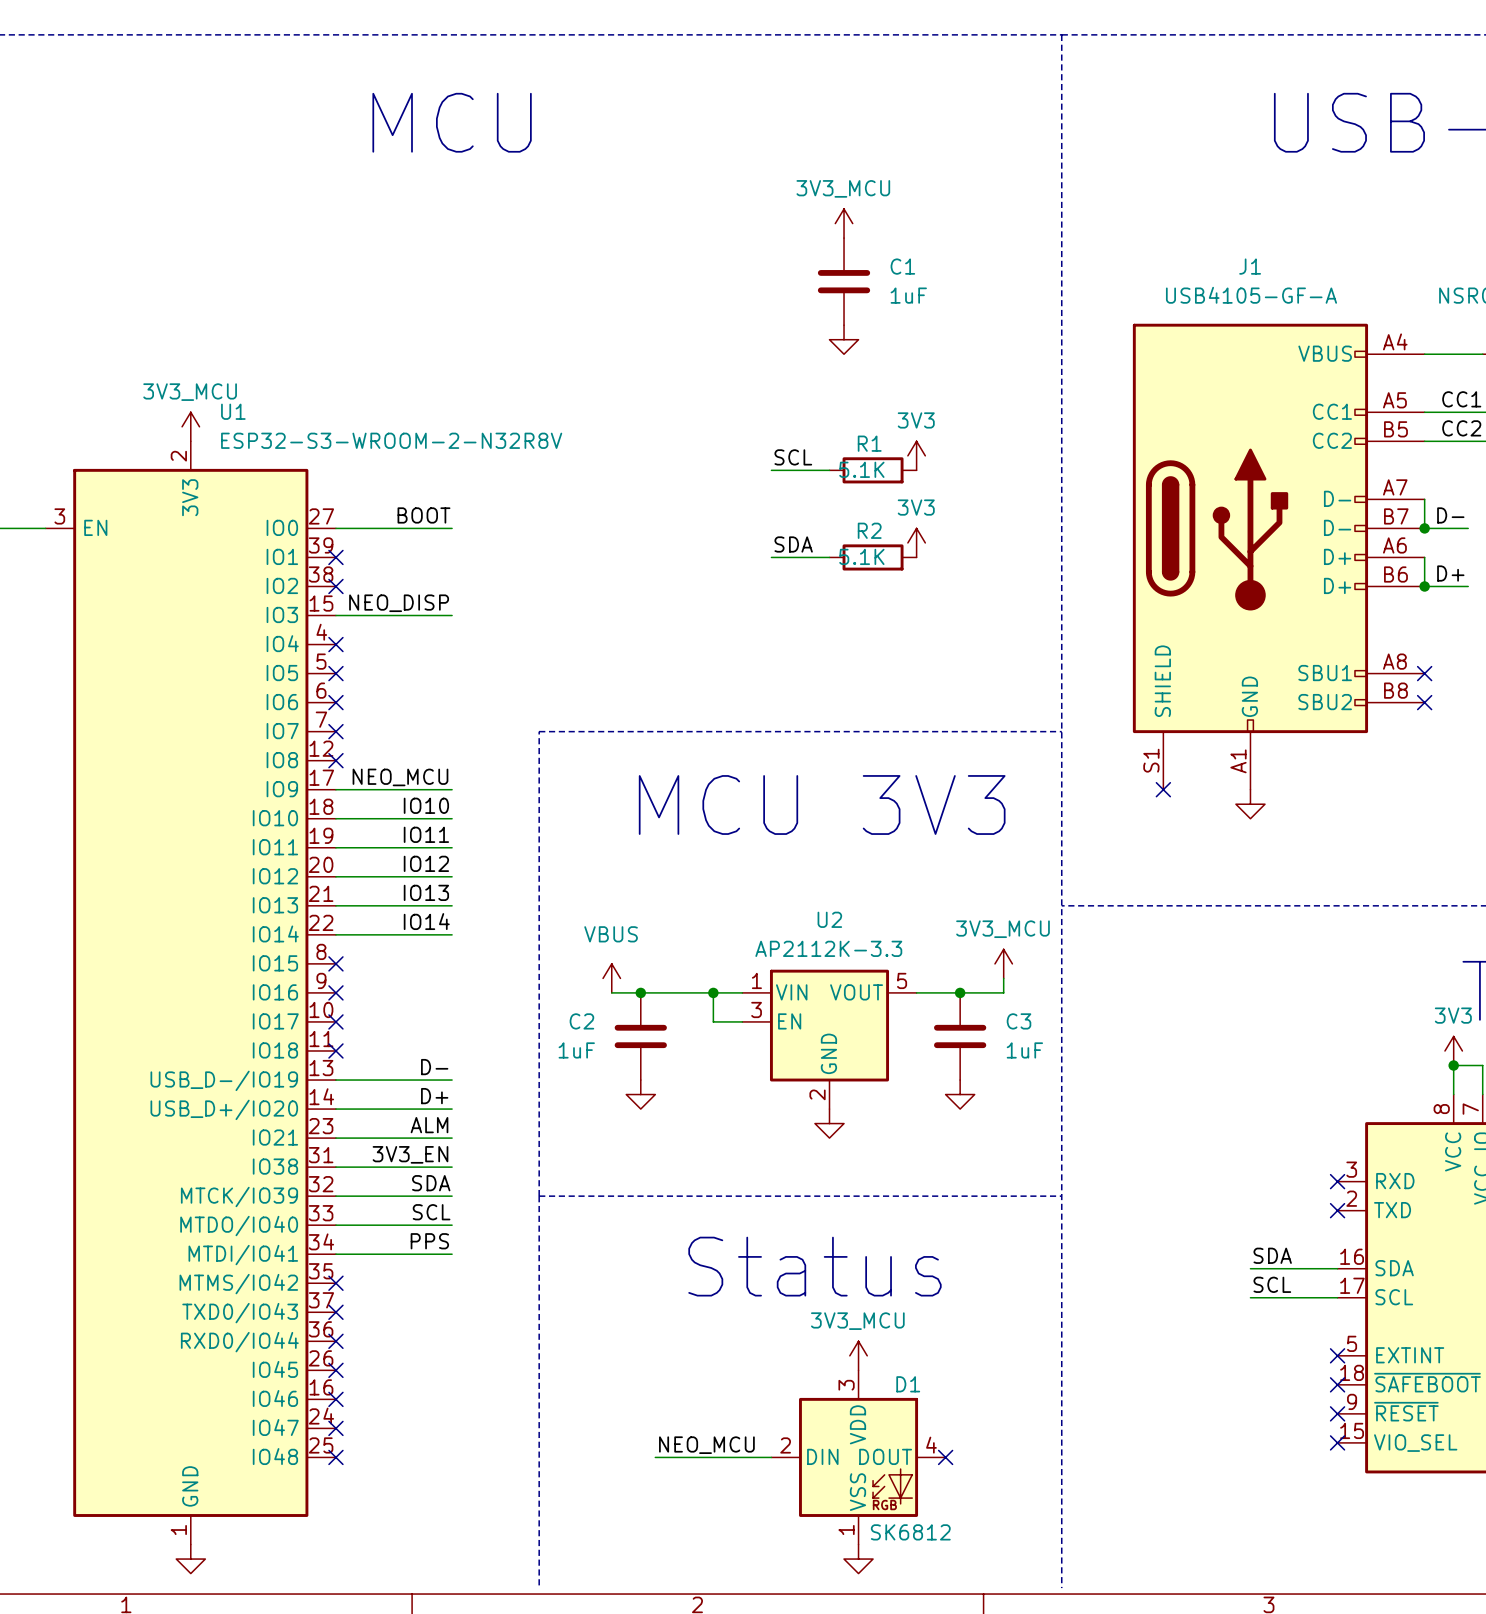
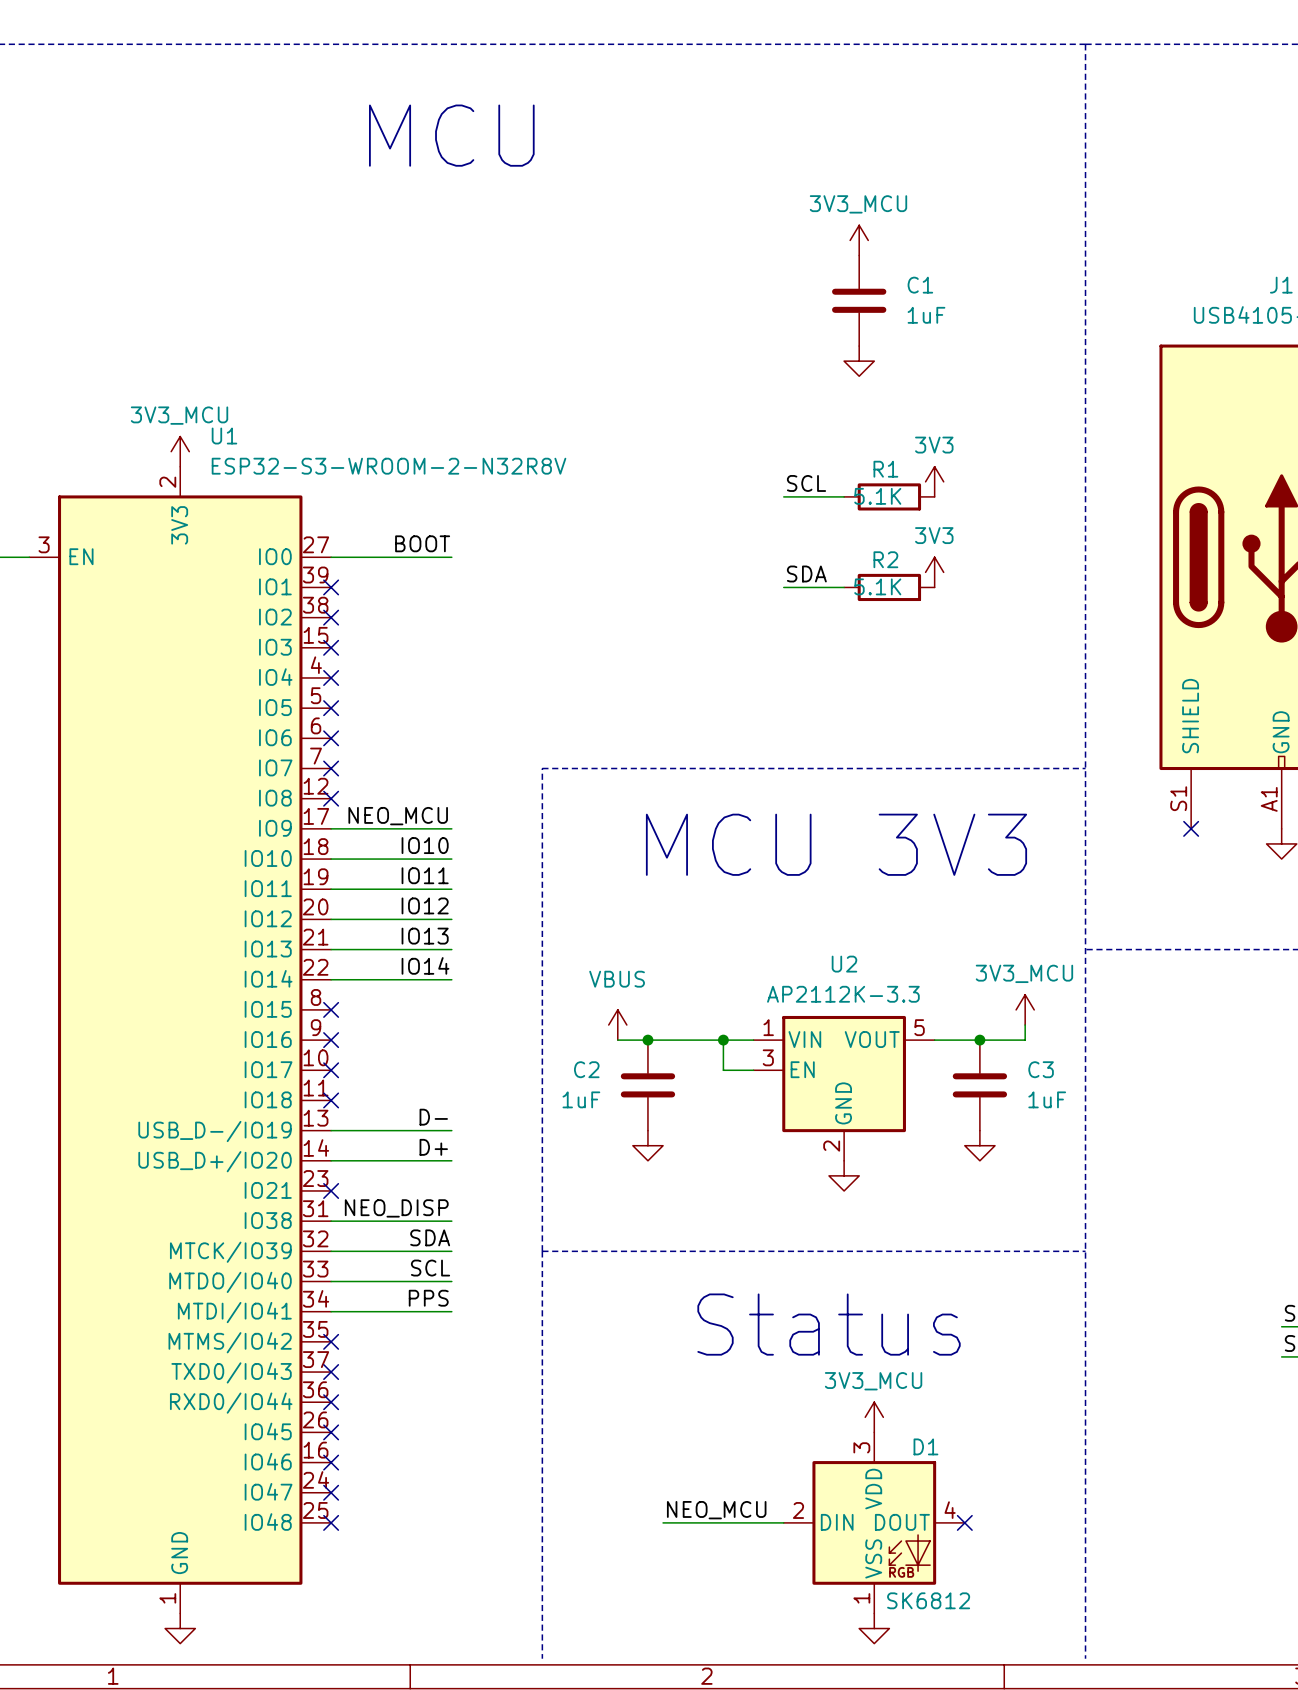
label: NEO_DISP (399, 603) -> none
wire: (335, 615) (452, 615) -> none
no-connect mark: none -> (331, 647)
label: ALM (429, 1125) -> none
wire: (335, 1138) (452, 1138) -> none
no-connect mark: none -> (331, 1190)
label: 3V3_EN (410, 1154) -> NEO_DISP (396, 1208)

